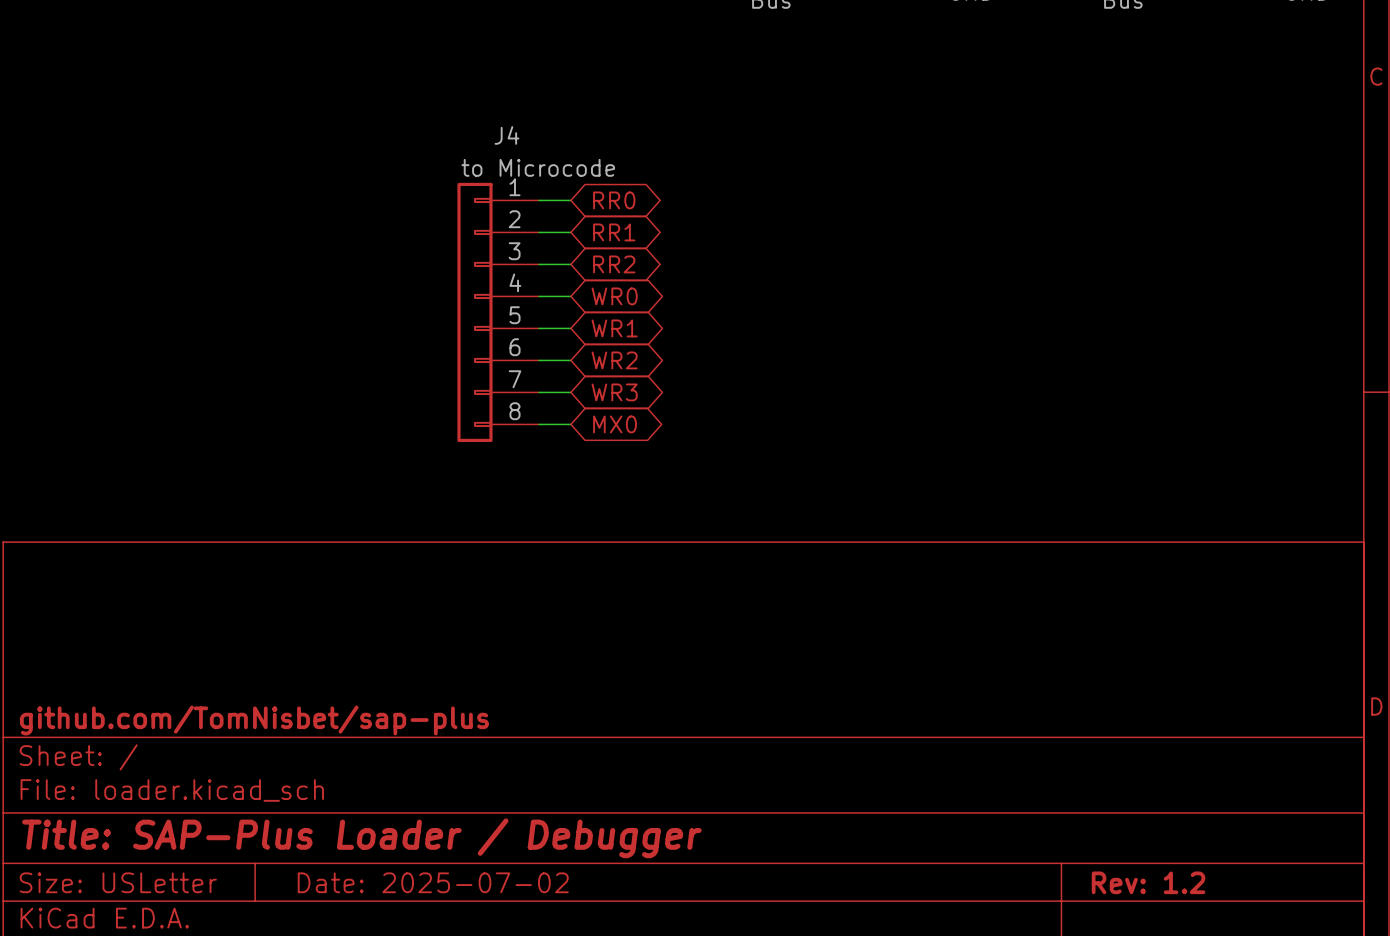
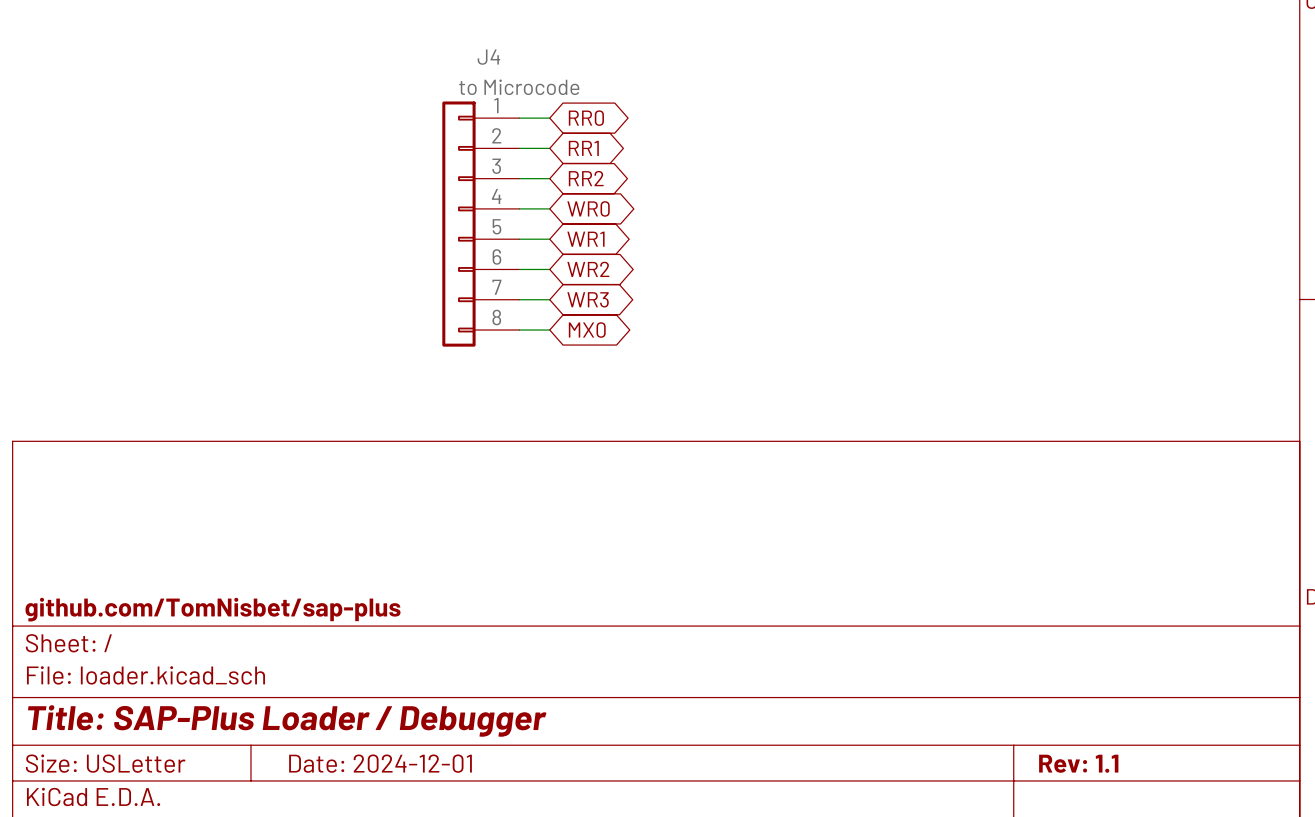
title block: Date: 2025-07-02 (433, 882) -> Date: 2024-12-01 (380, 763)
title block: Rev: 1.2 (1148, 882) -> Rev: 1.1 (1078, 763)

